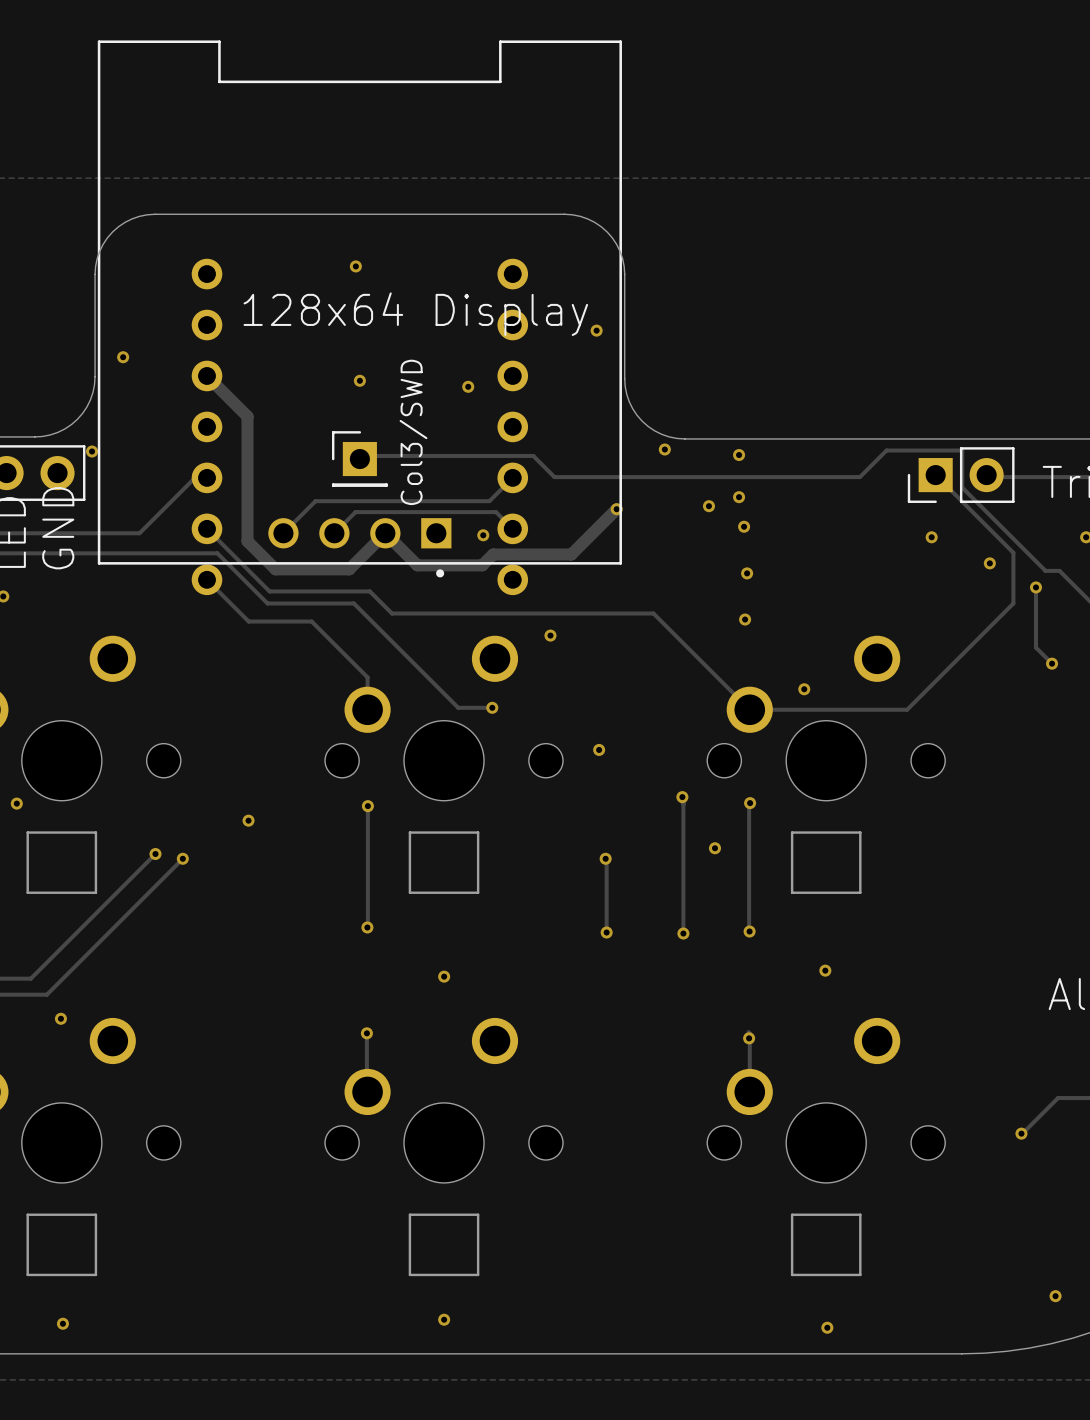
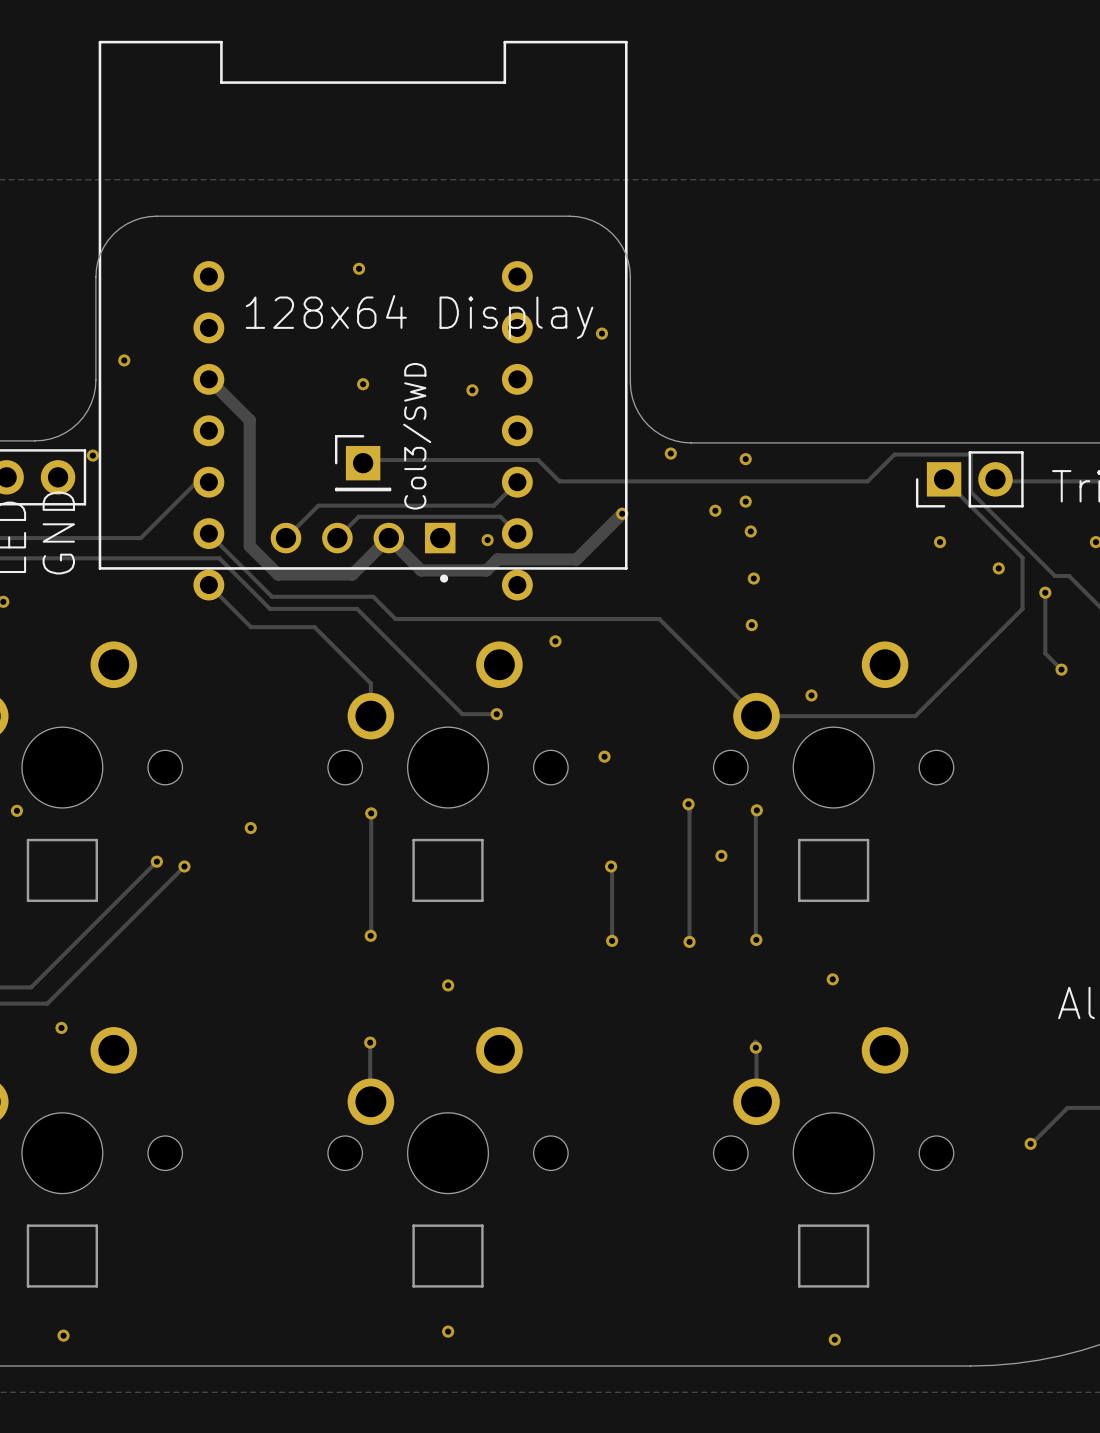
via: (1055, 1296) -> none

